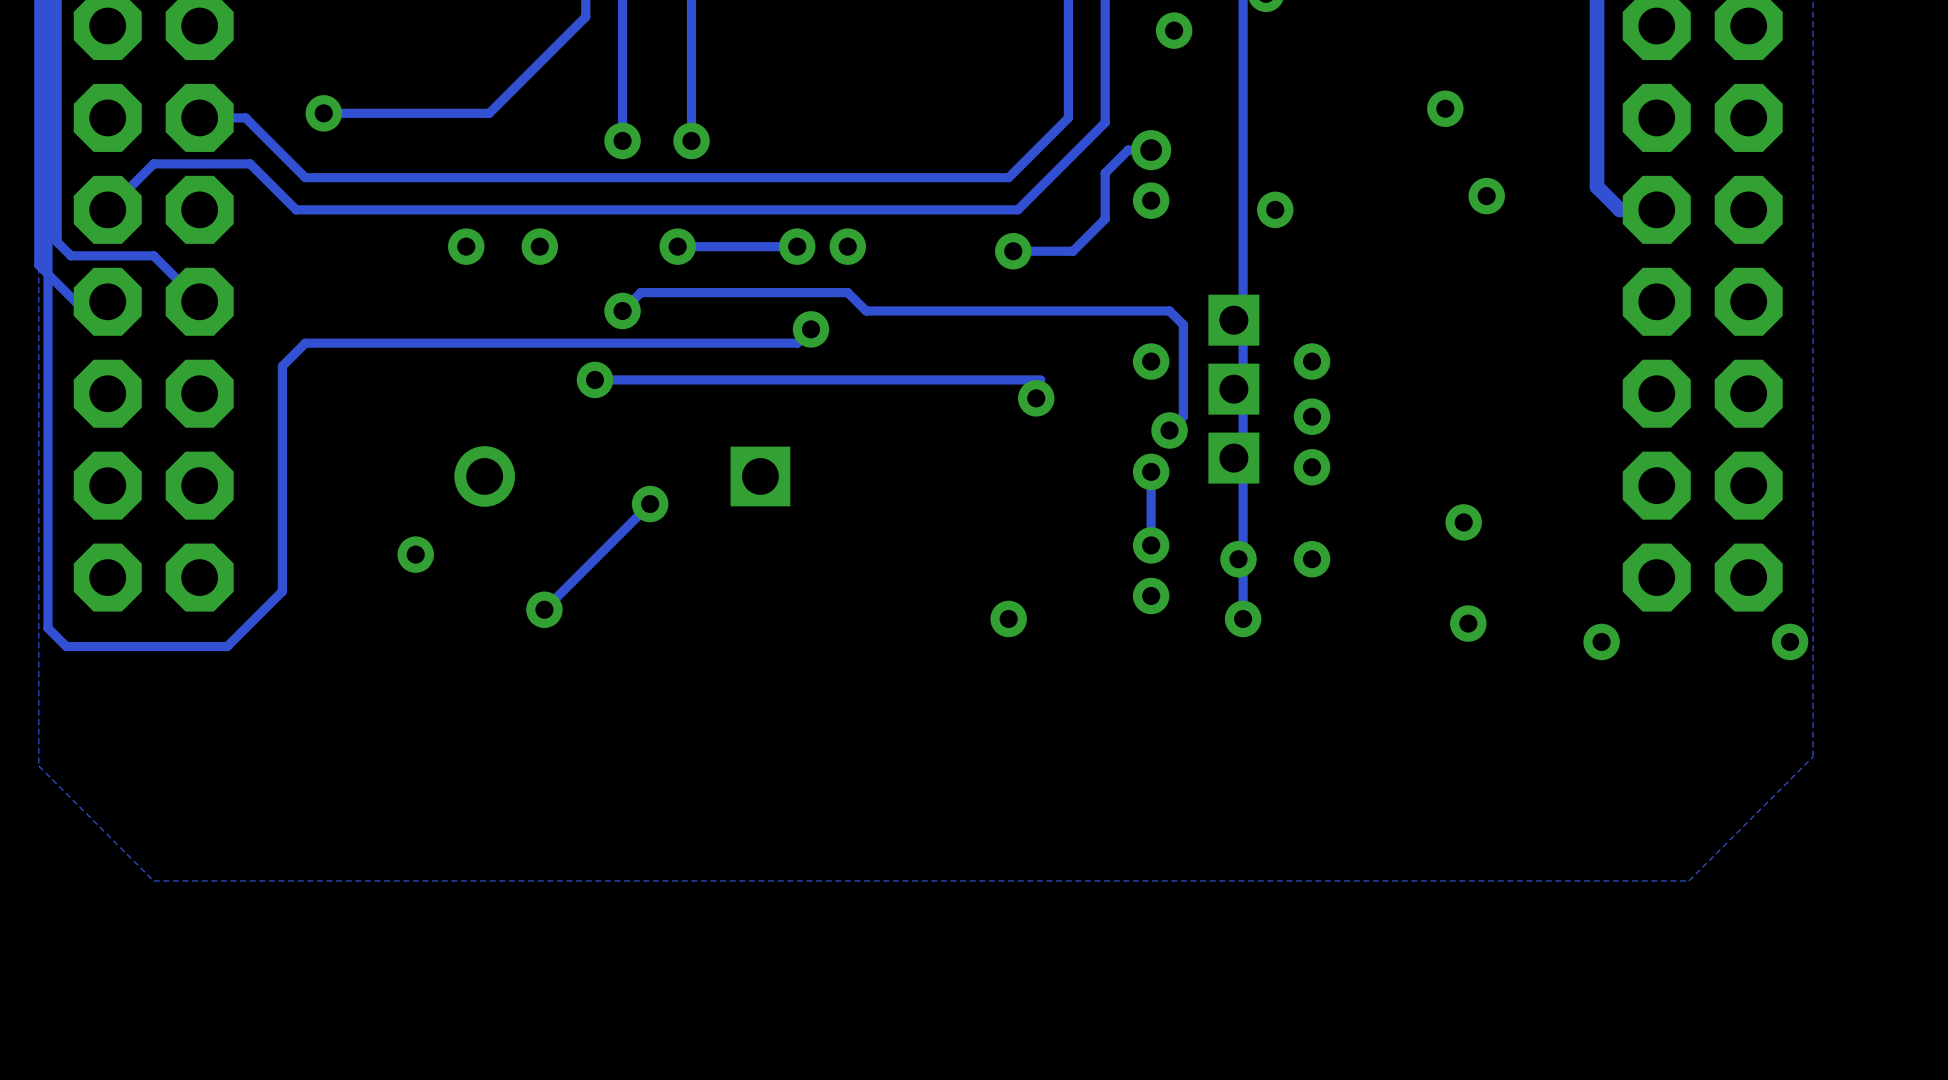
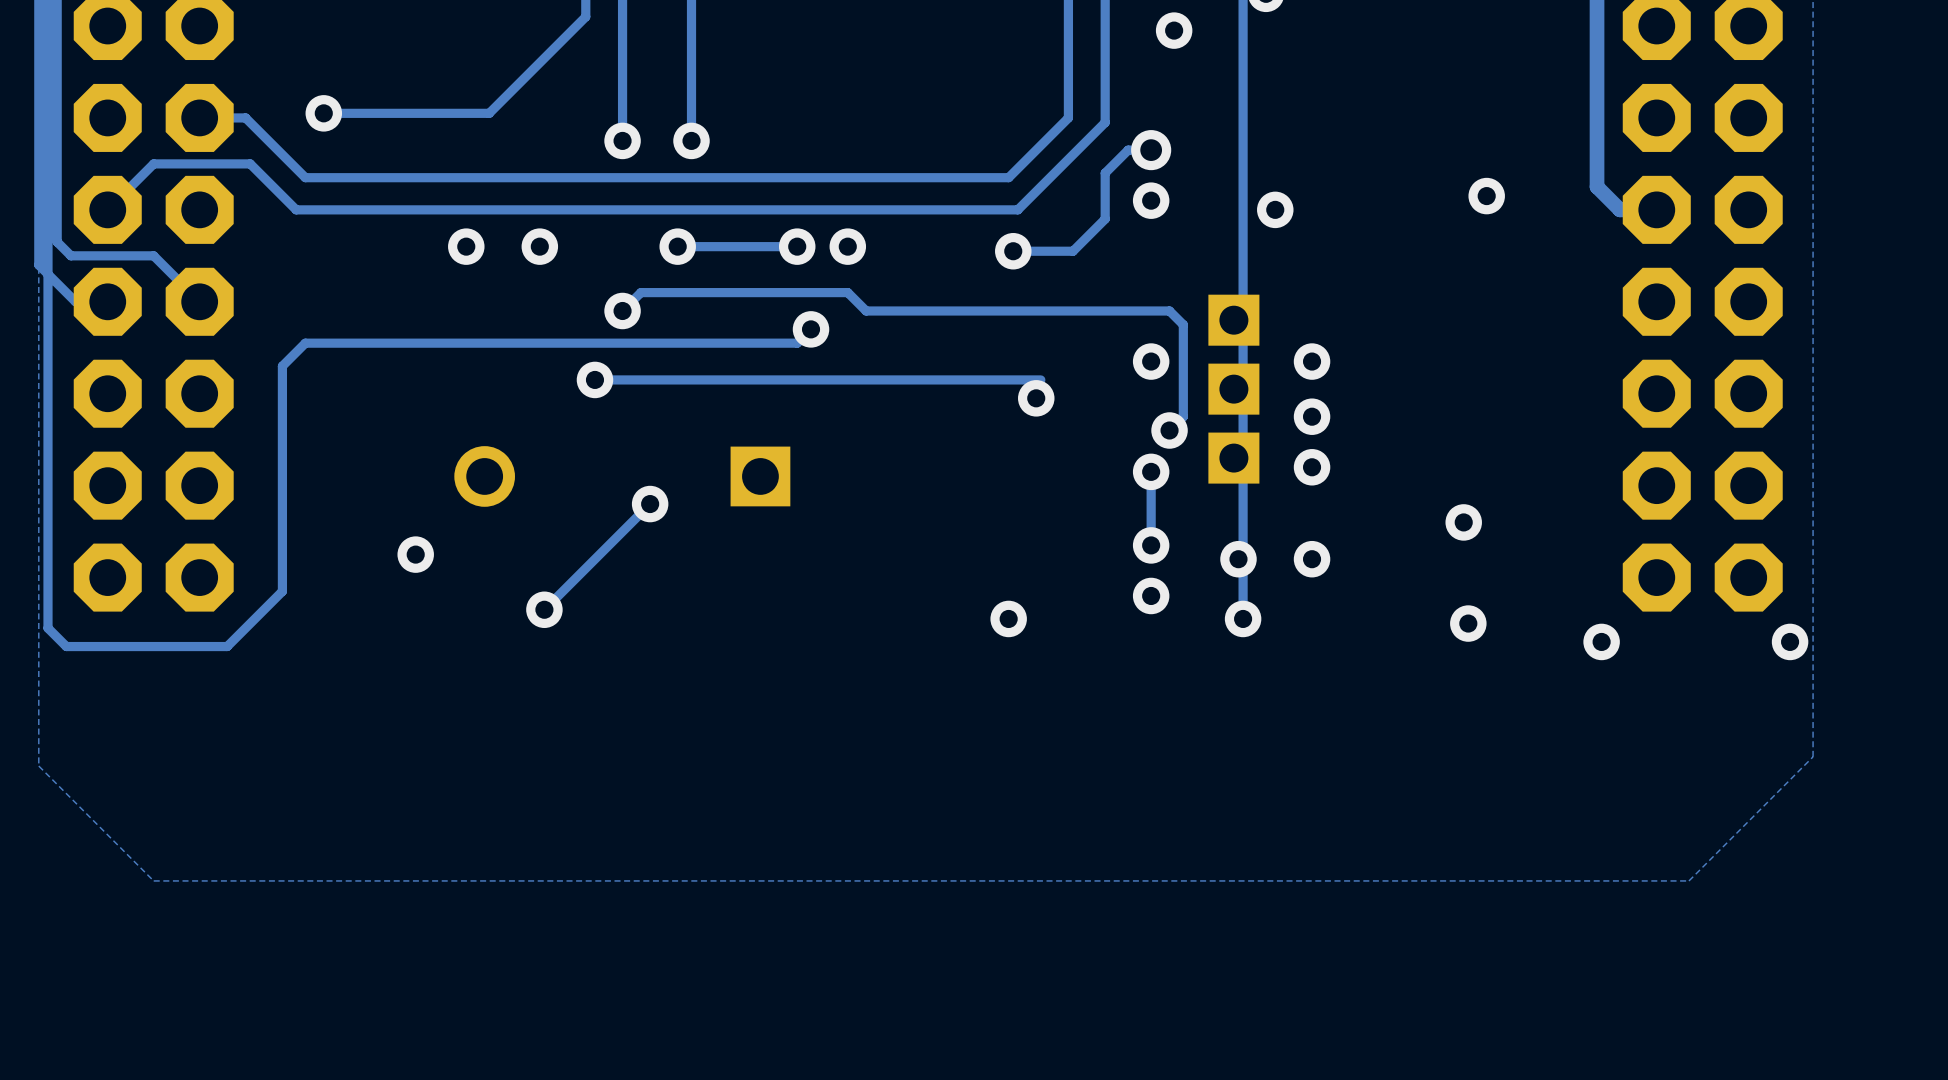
via: (1445, 108) -> none

